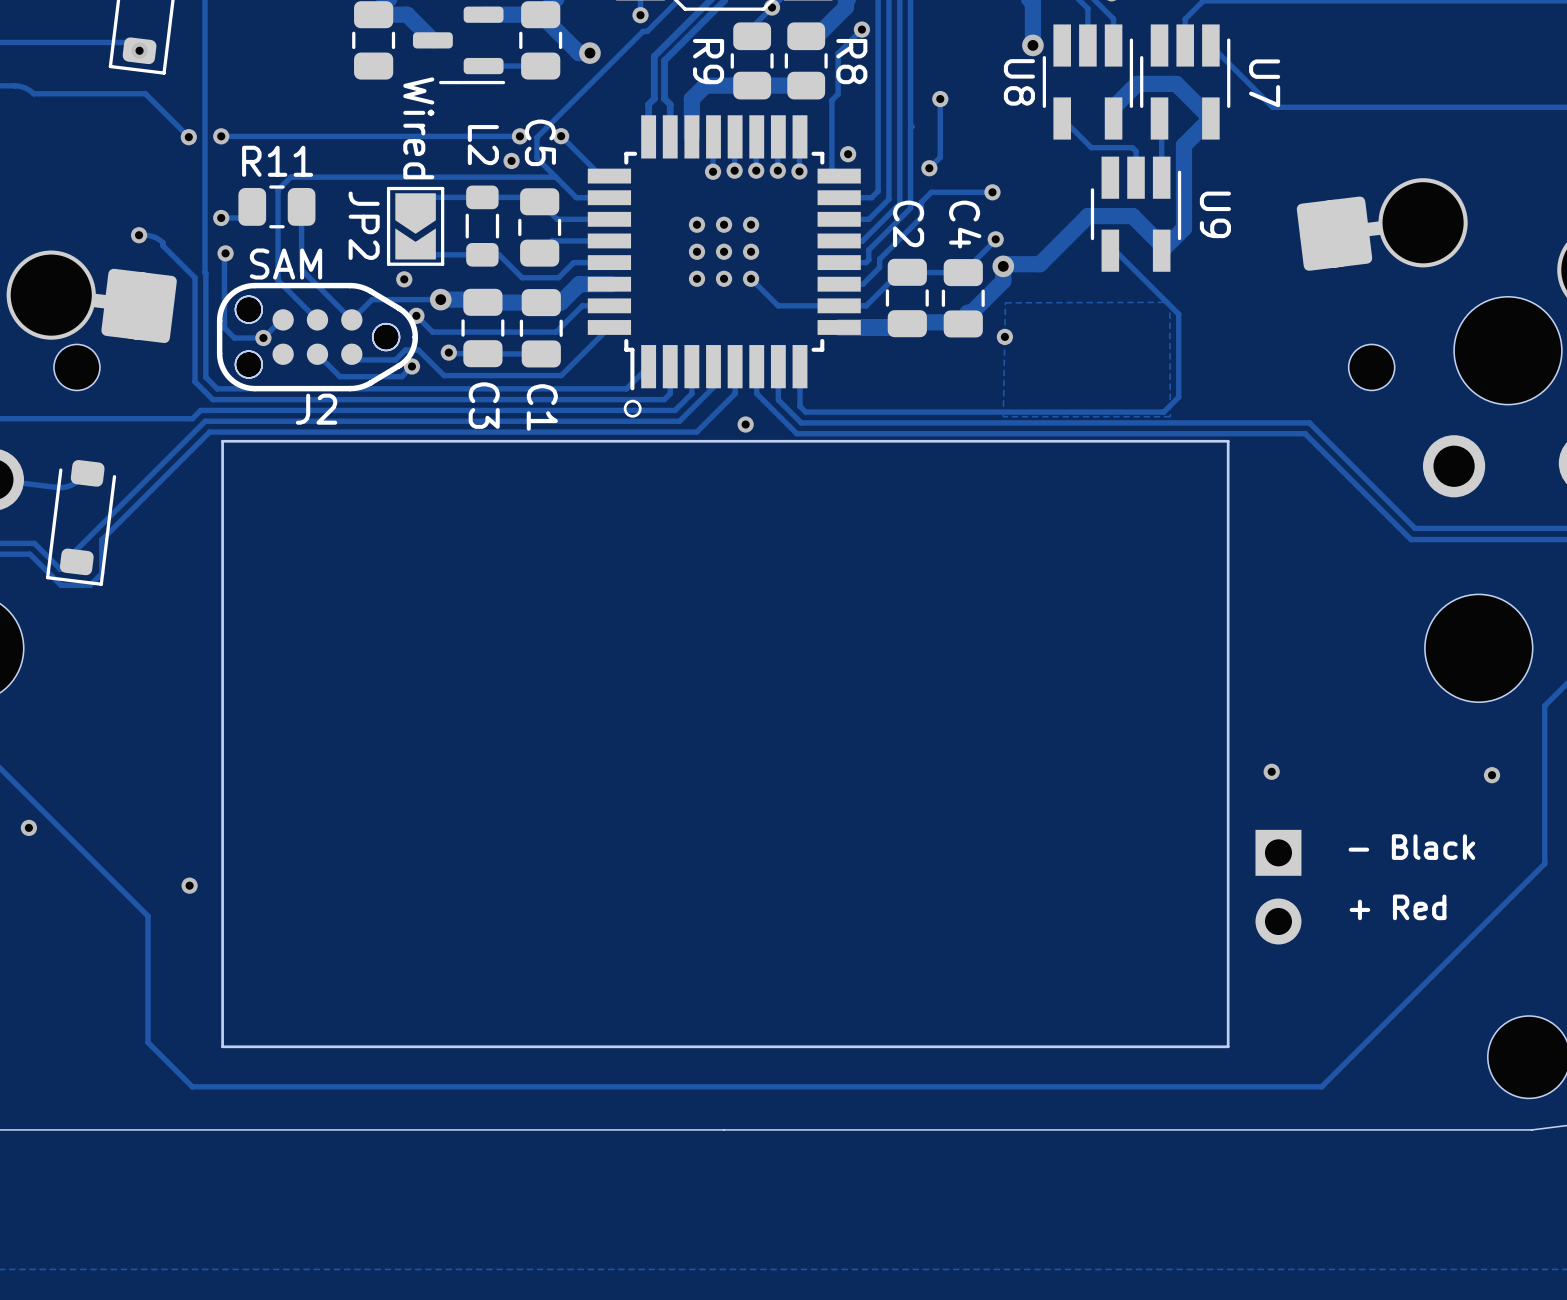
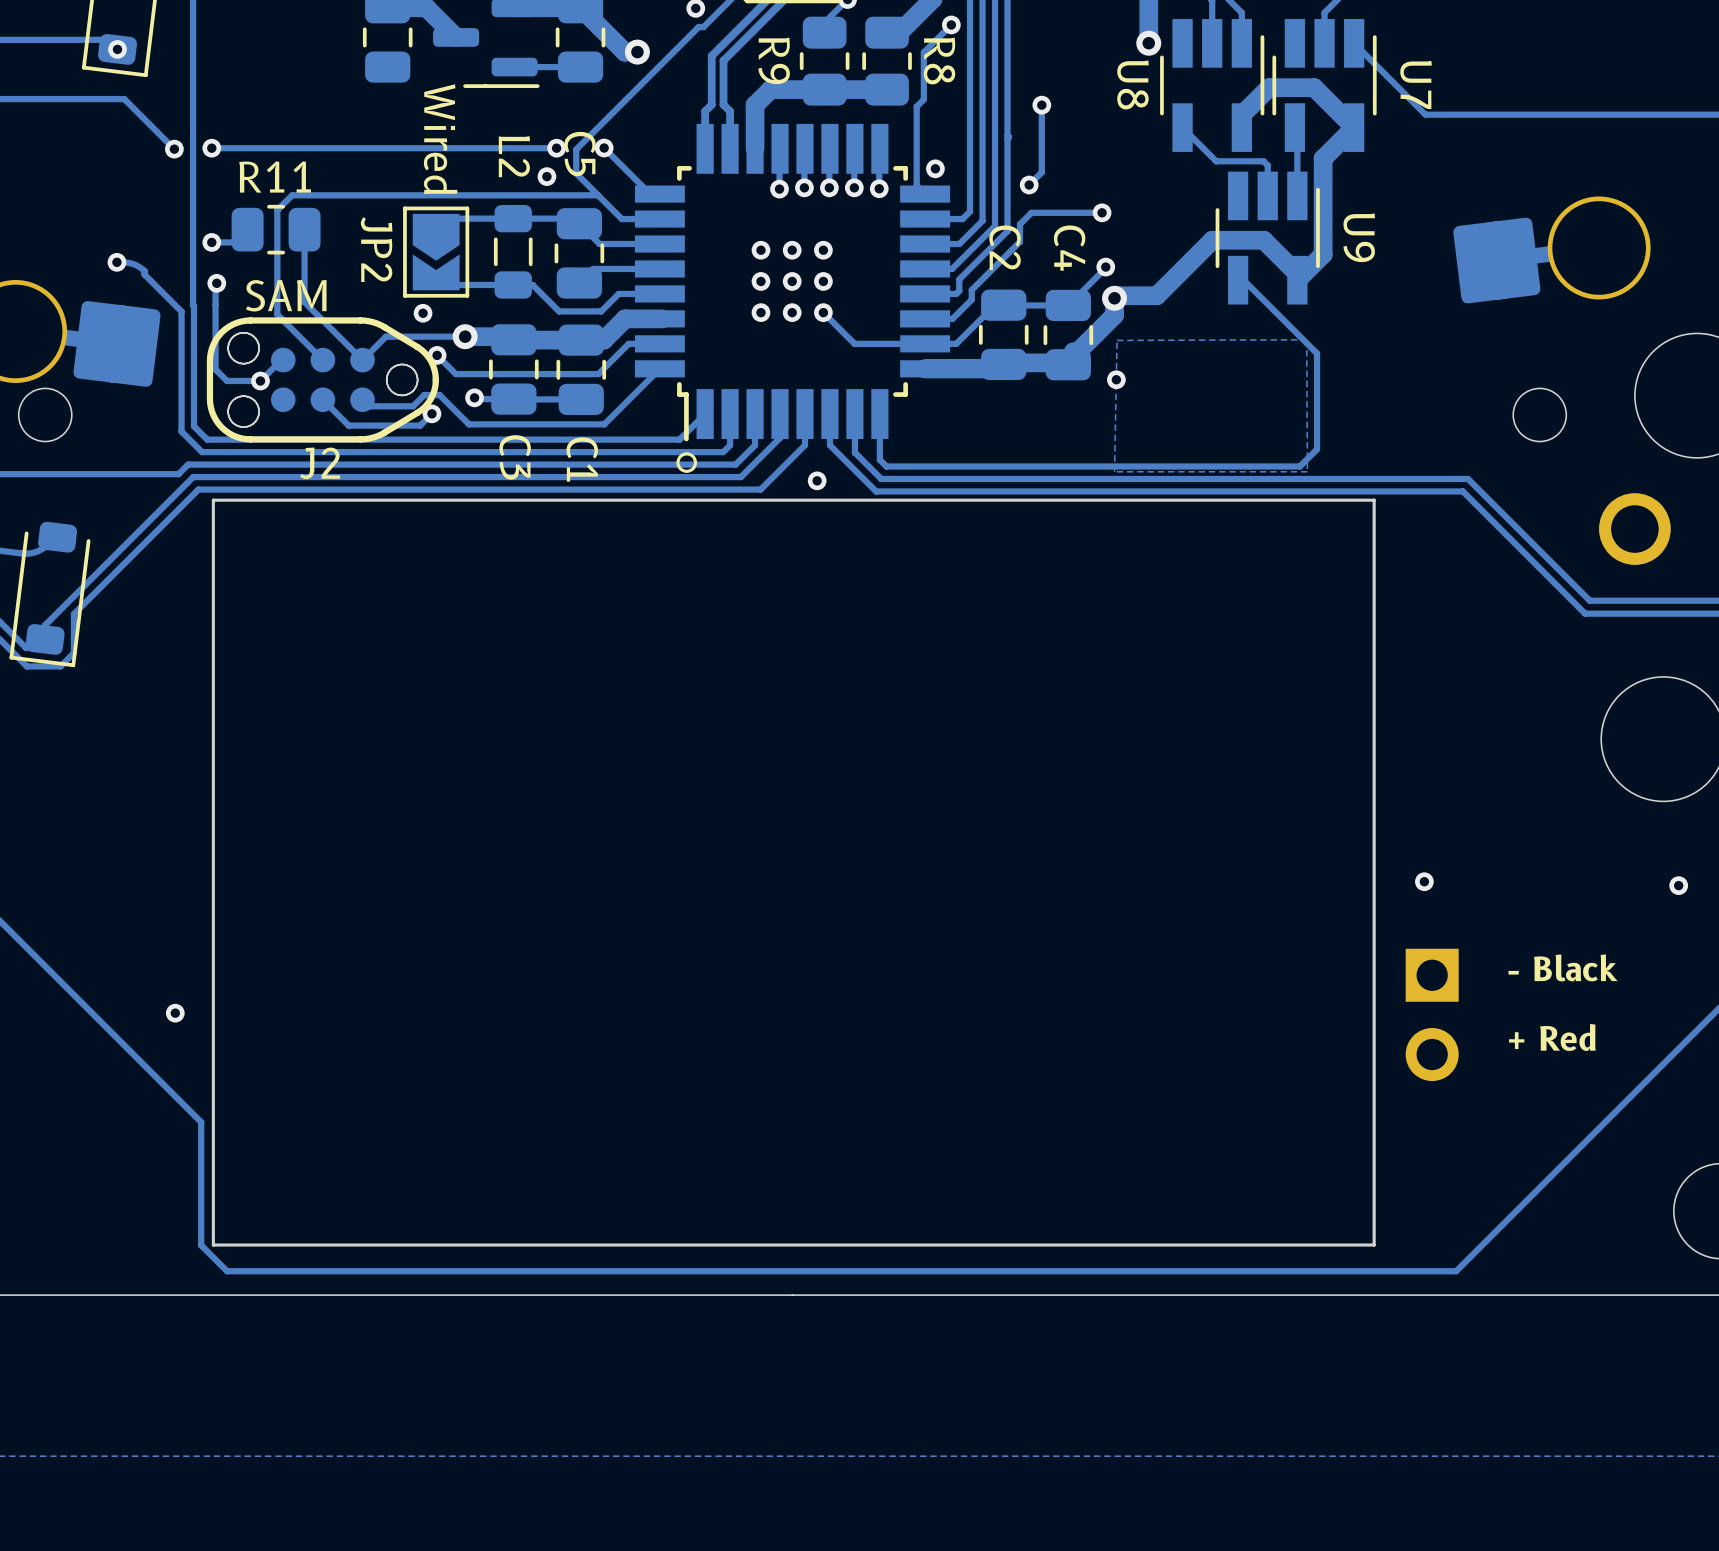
track: (147, 916) (147, 1042) (192, 1086) (1321, 1086) -> (127, 1048) (201, 1122) (201, 1245) (227, 1271) (1456, 1271) (1482, 1245)
board edge: (1228, 1046) (222, 1046) -> (1374, 1199) (1374, 1245) (213, 1245) (213, 1199)

